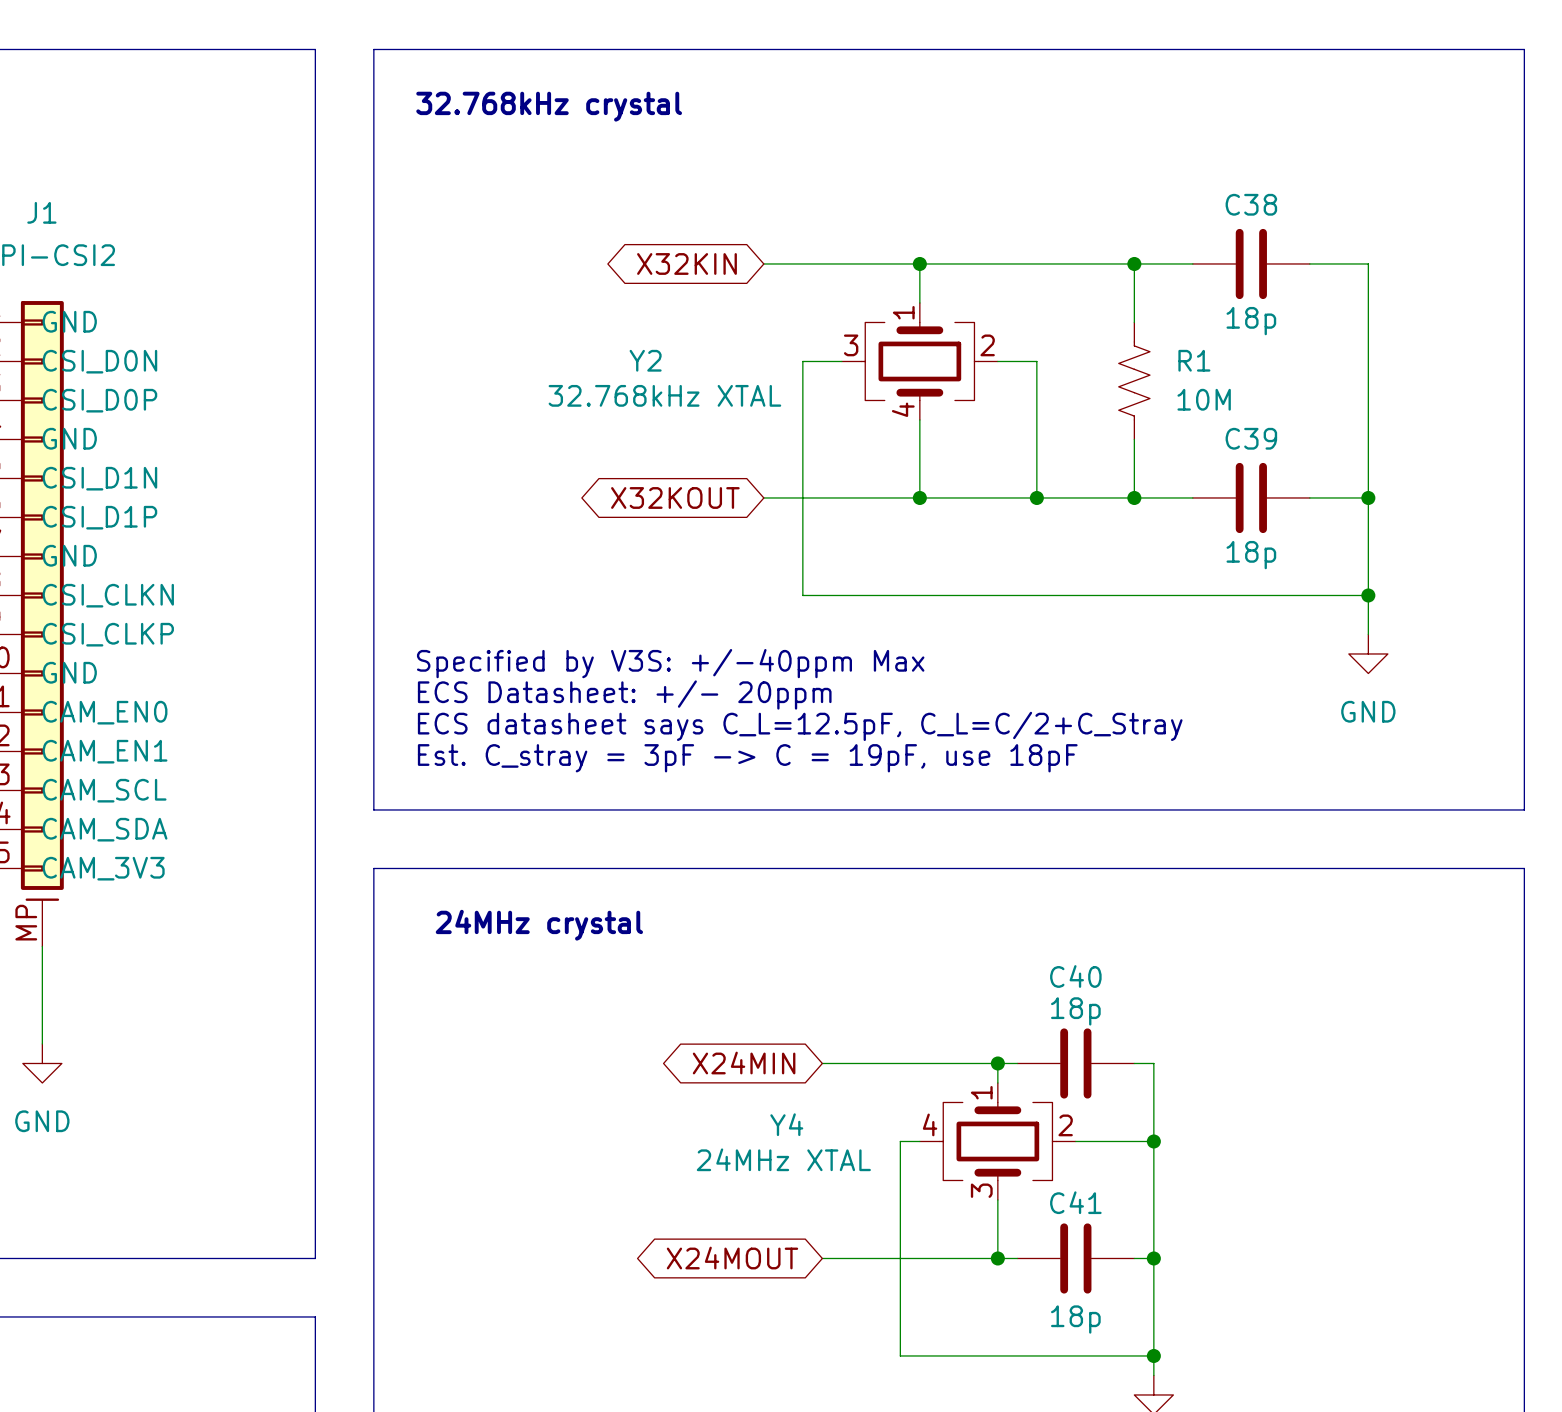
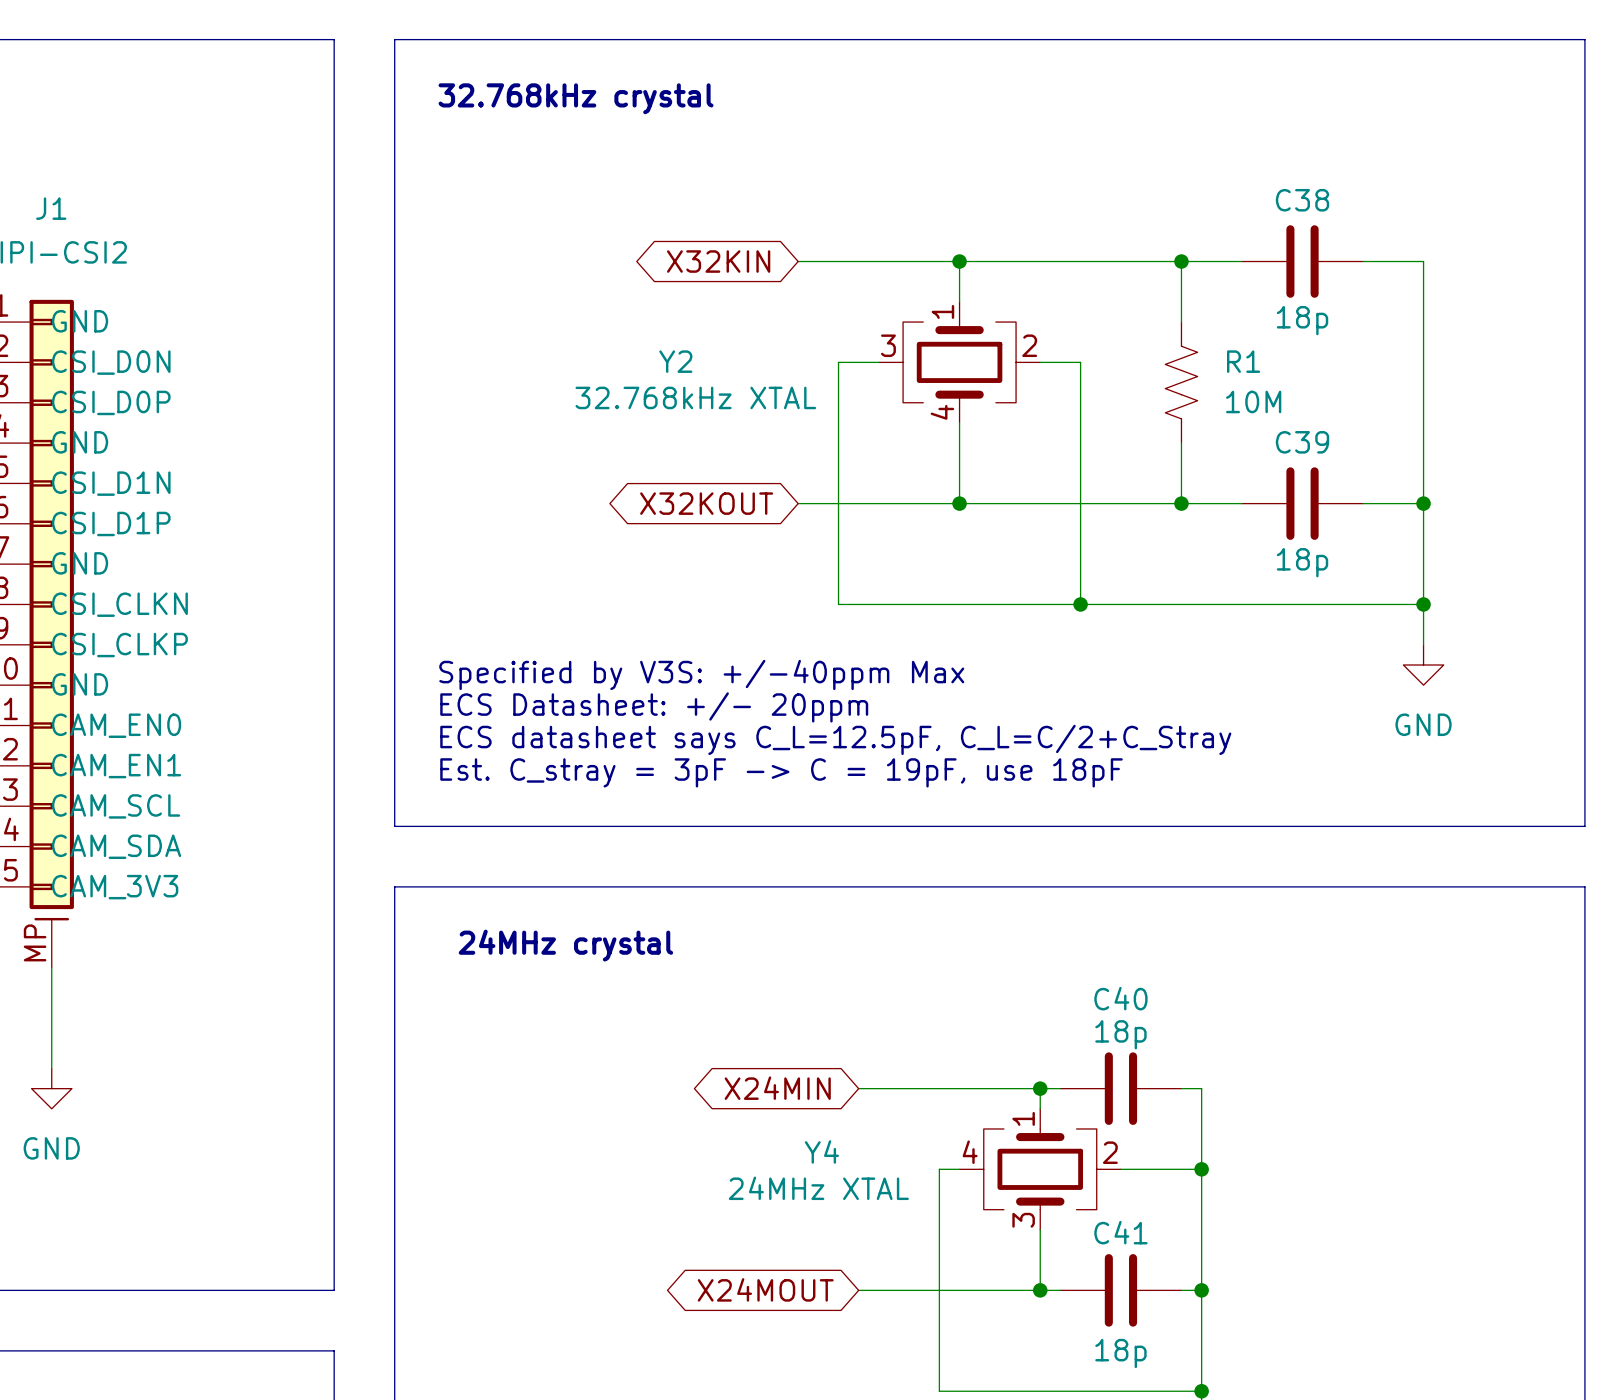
wire: none -> (1080, 503) (1080, 604)
junction: (1036, 497) -> none
junction: none -> (1080, 604)

